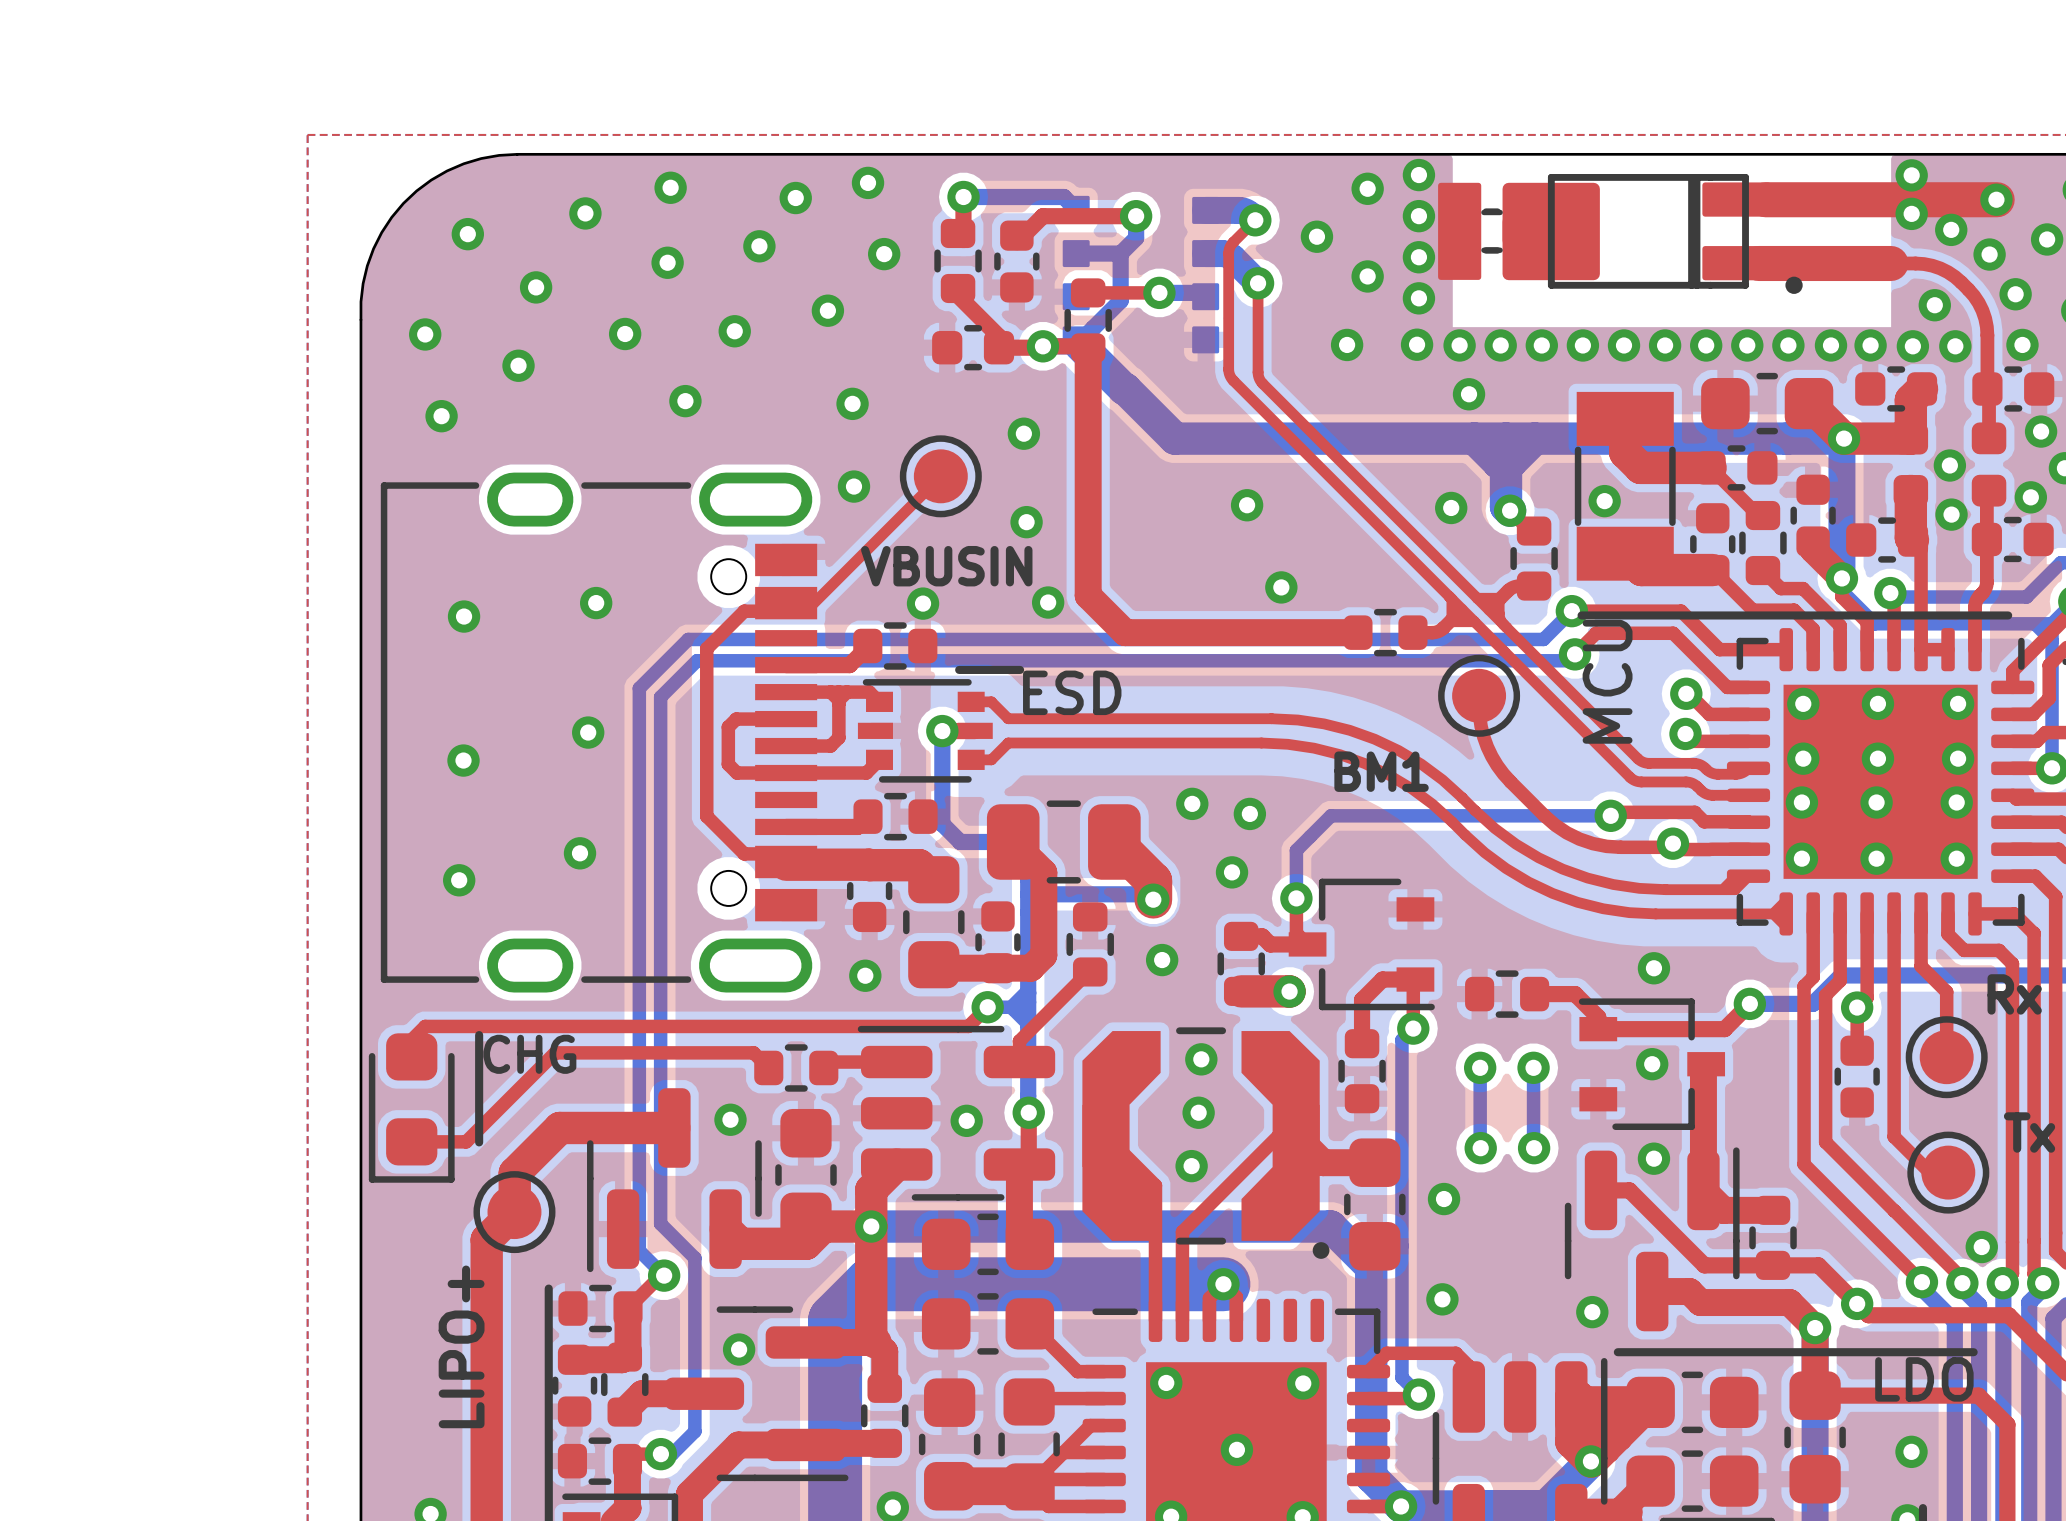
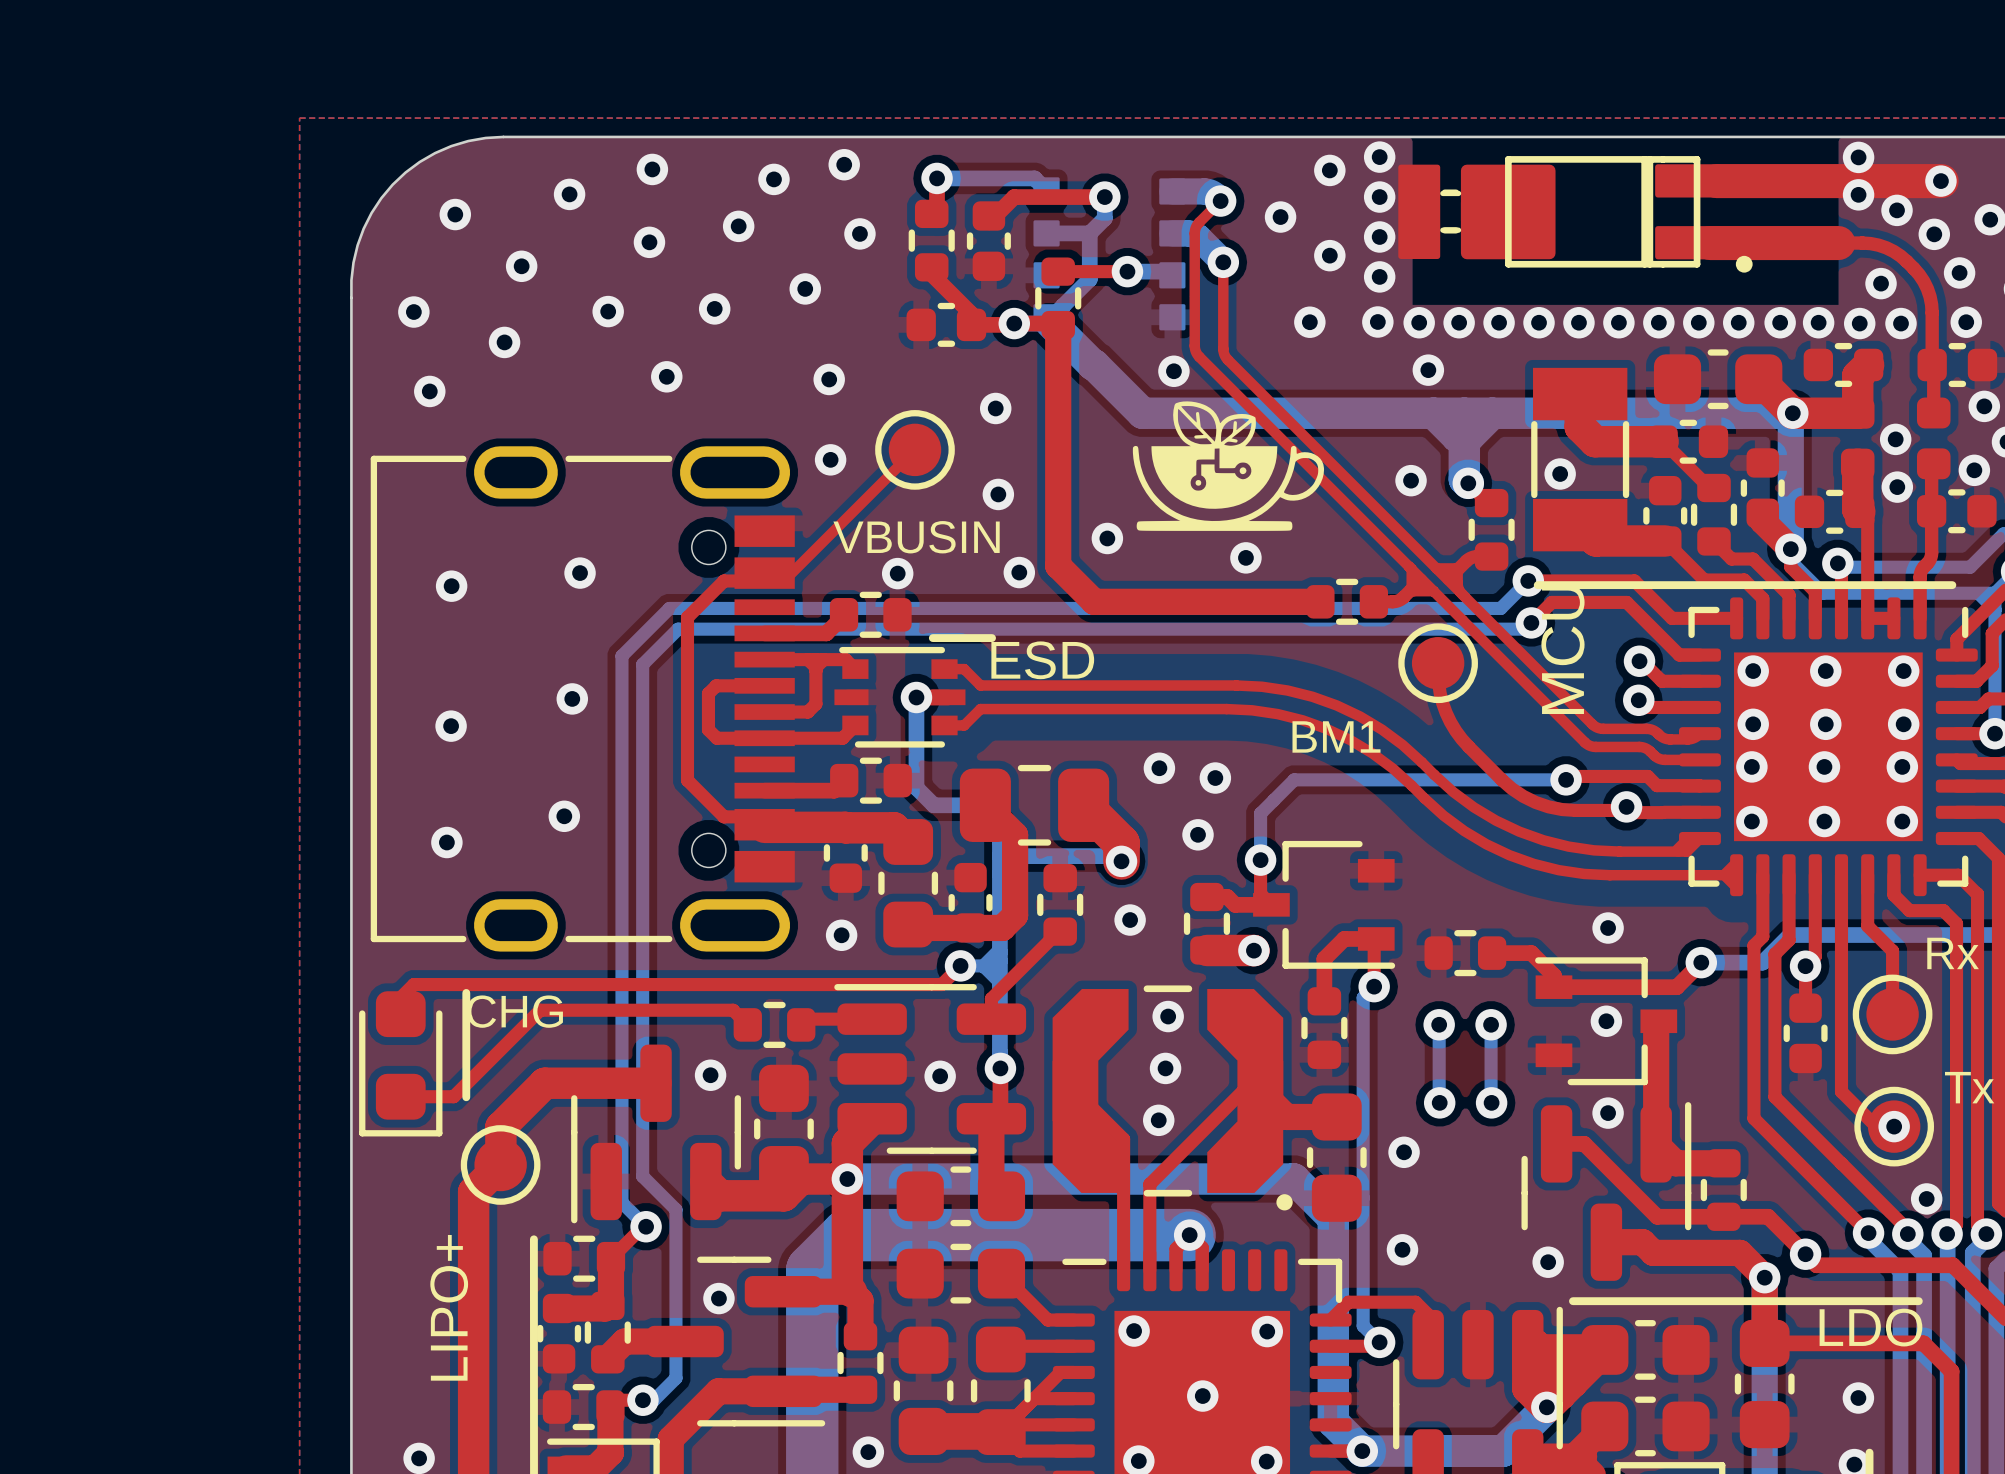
via: none -> (1173, 371)
drawing: none -> [1132, 401, 1325, 531]
via: (1247, 505) -> none
via: none -> (1107, 538)
via: none -> (1894, 1126)

